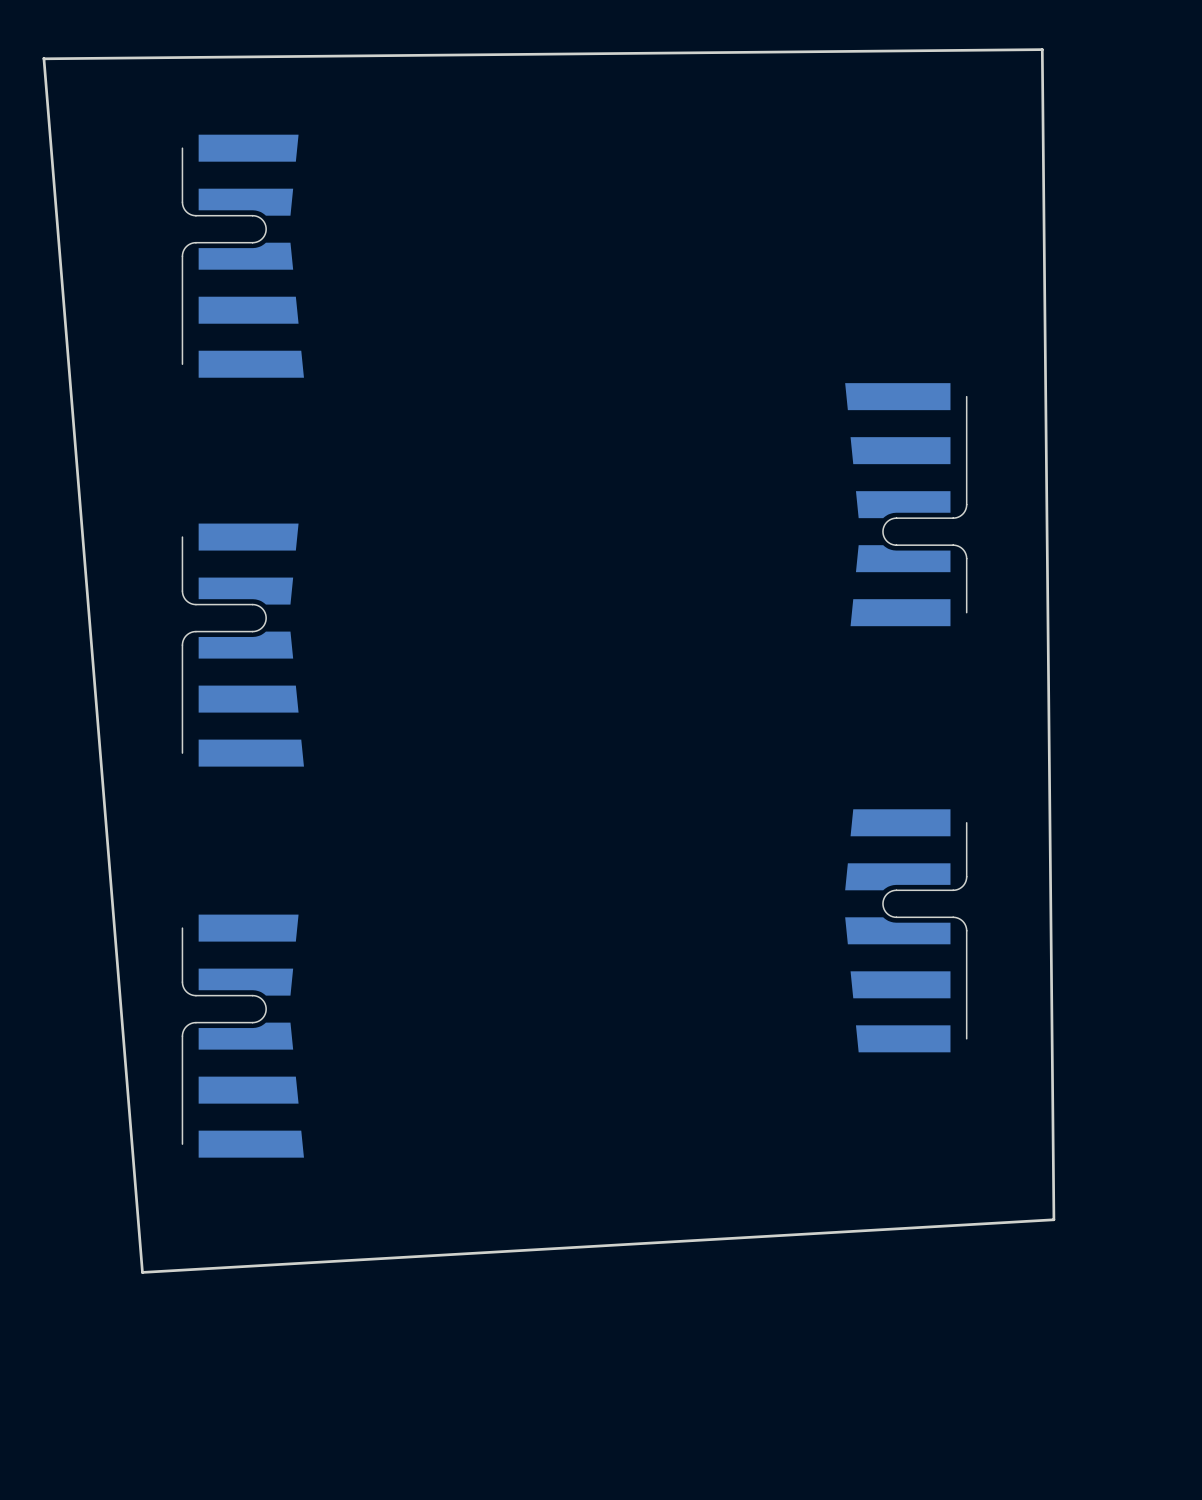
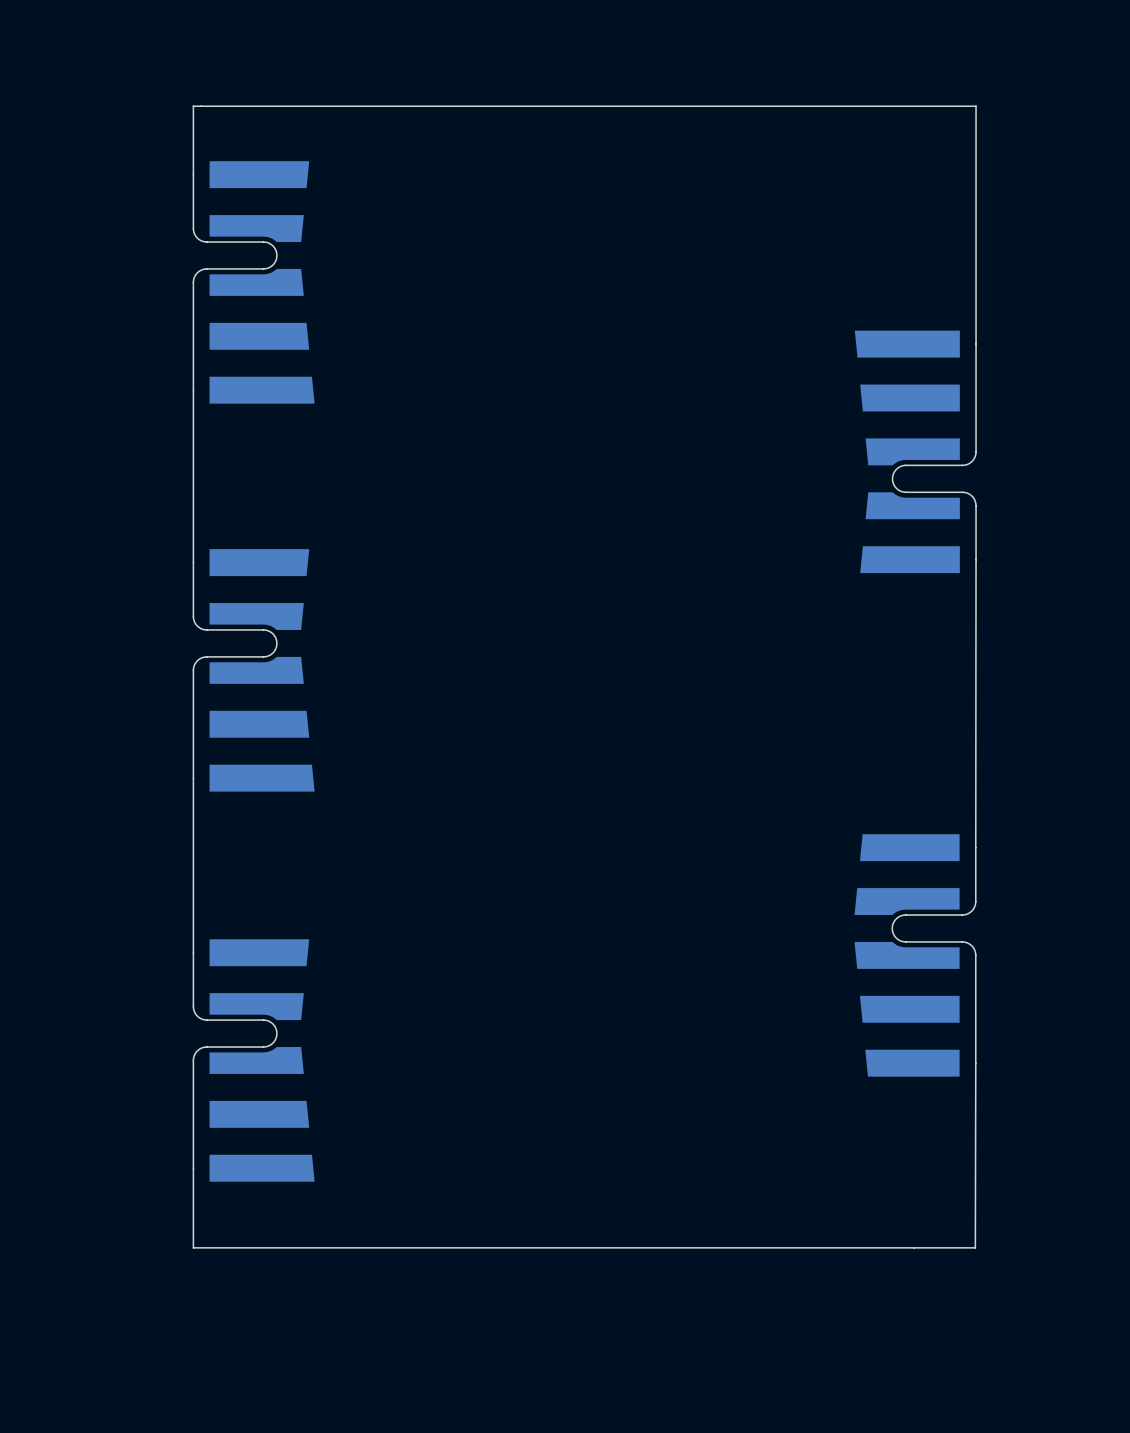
board edge: (43, 58) (142, 1272) (1053, 1219) (1042, 49) (43, 58) -> none
board edge: none -> (193, 174) (193, 106) (976, 106) (976, 344)
board edge: none -> (193, 390) (193, 562)
part position: (906, 504) -> (915, 451)
board edge: none -> (976, 559) (975, 847)
board edge: none -> (193, 778) (193, 952)
board edge: none -> (975, 1063) (975, 1247) (193, 1247) (193, 1168)

